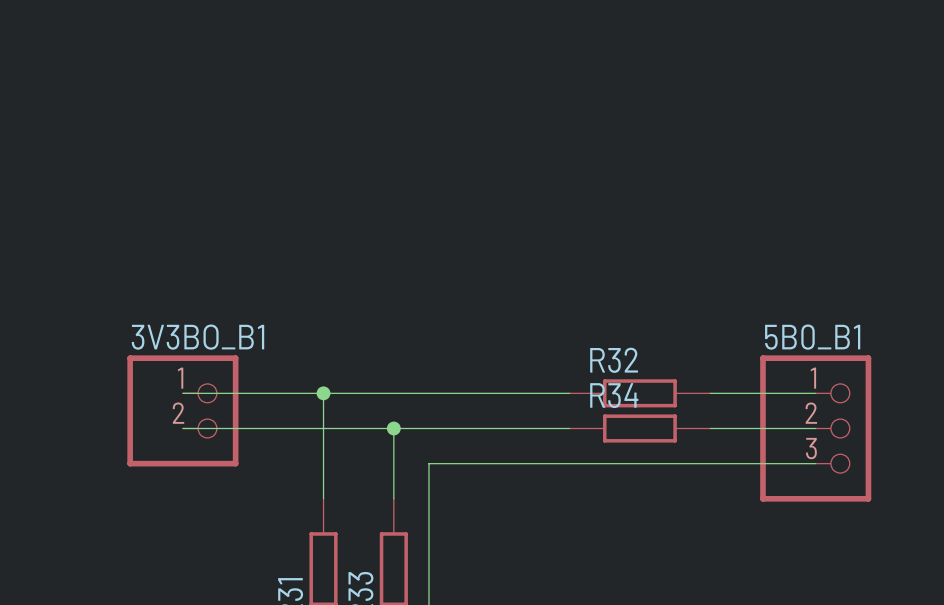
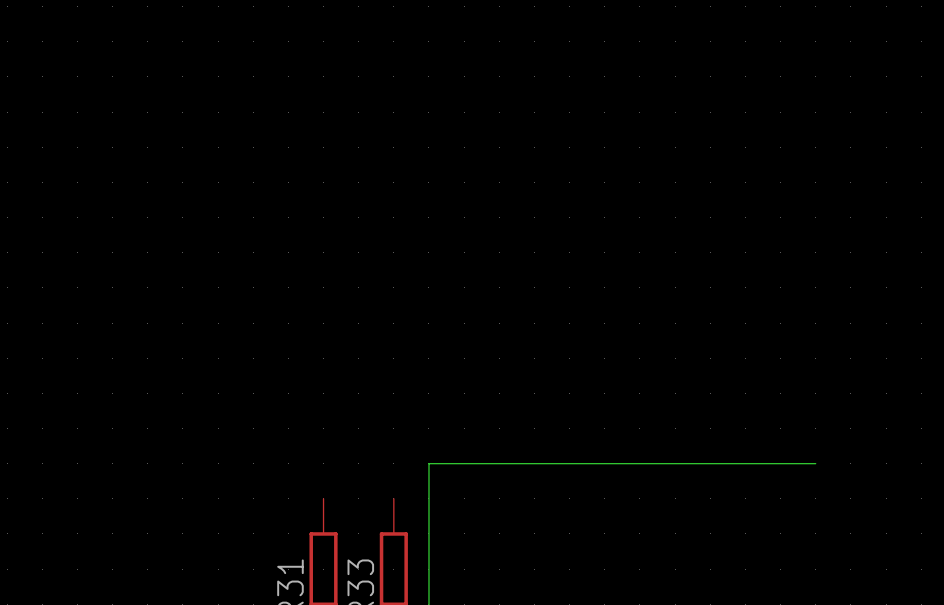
wire: (182, 393) (569, 393) -> none
wire: (323, 393) (323, 498) -> none
junction: (323, 393) -> none
R32: (639, 393) -> none
wire: (710, 393) (815, 393) -> none
3V3BO_B1: (182, 410) -> none
wire: (182, 428) (569, 428) -> none
wire: (393, 428) (393, 498) -> none
junction: (393, 428) -> none
R34: (639, 428) -> none
wire: (710, 428) (815, 428) -> none
5B0_B1: (815, 428) -> none

